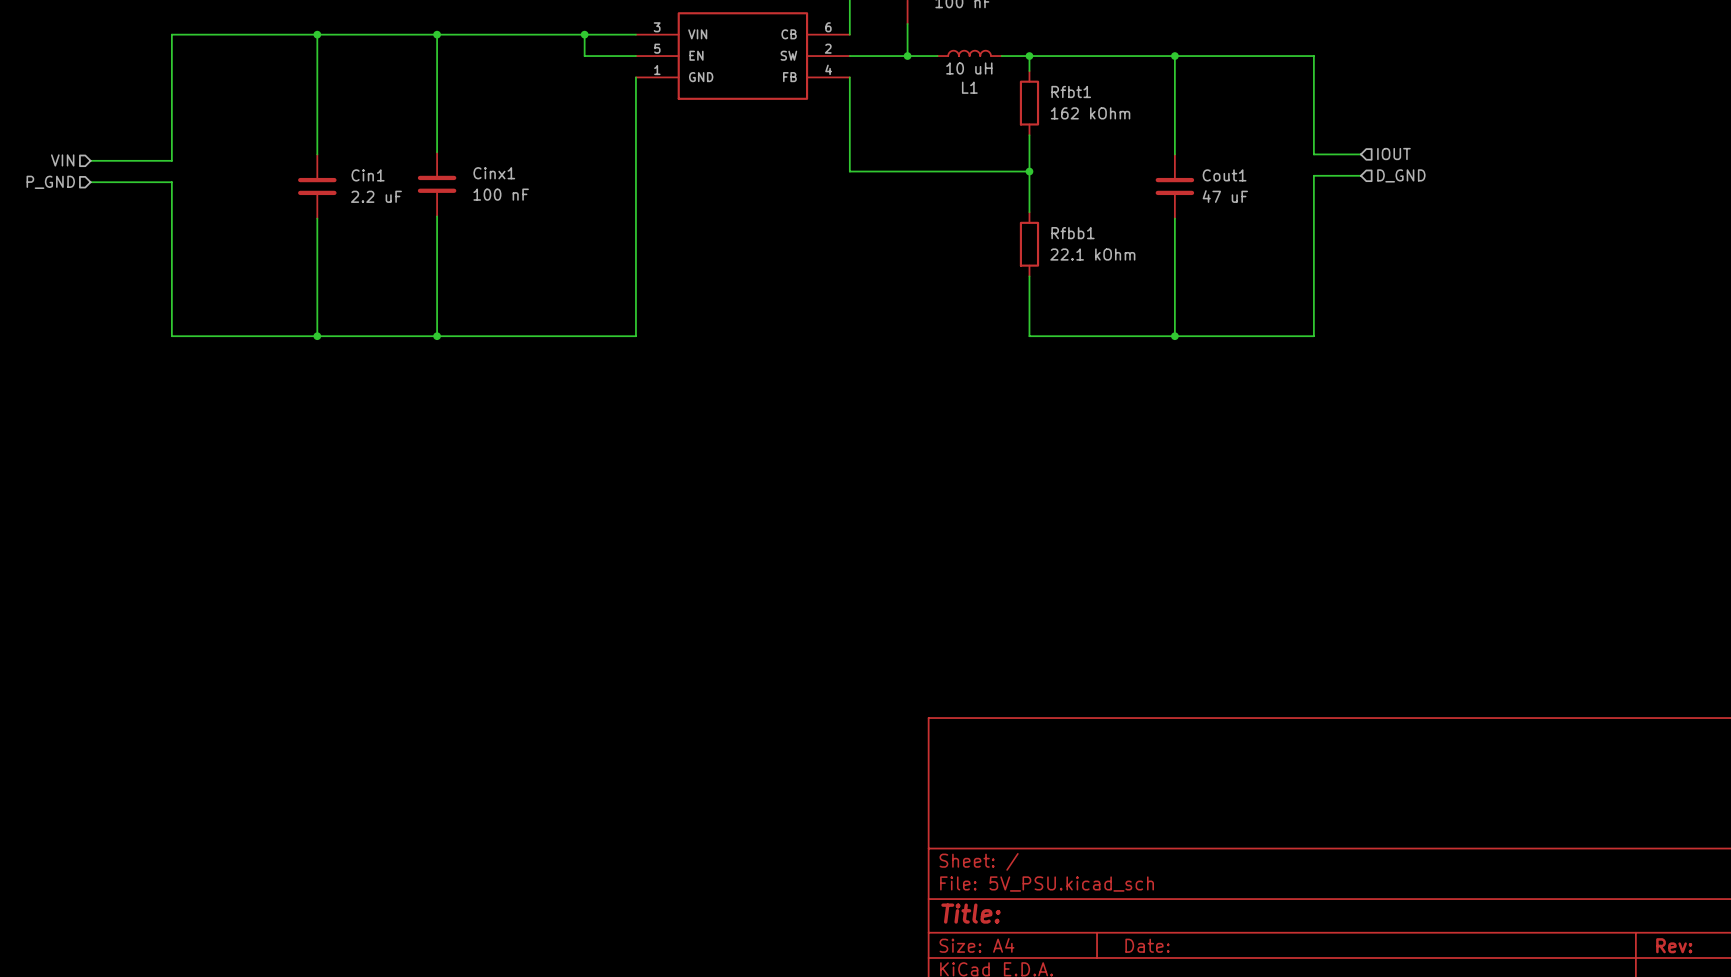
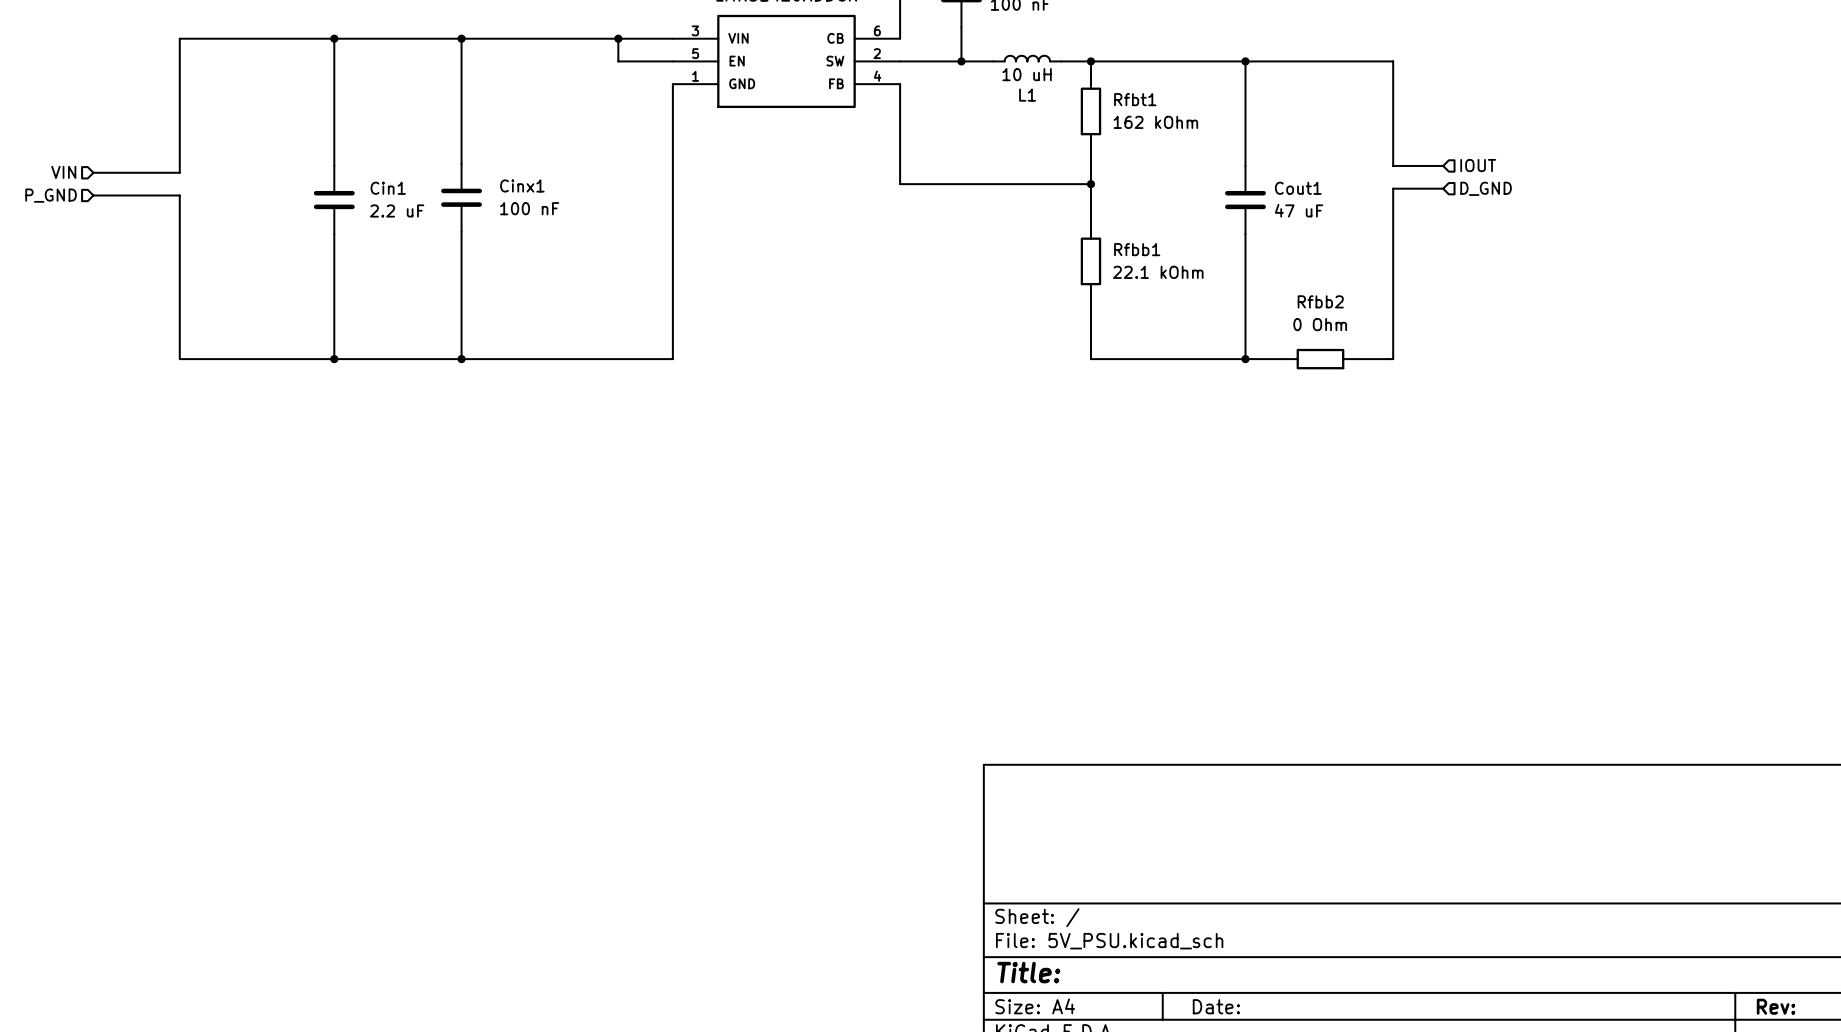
wire: (1213, 336) (1277, 336) -> none
Rfbb2: none -> 0 Ohm (1320, 359)

